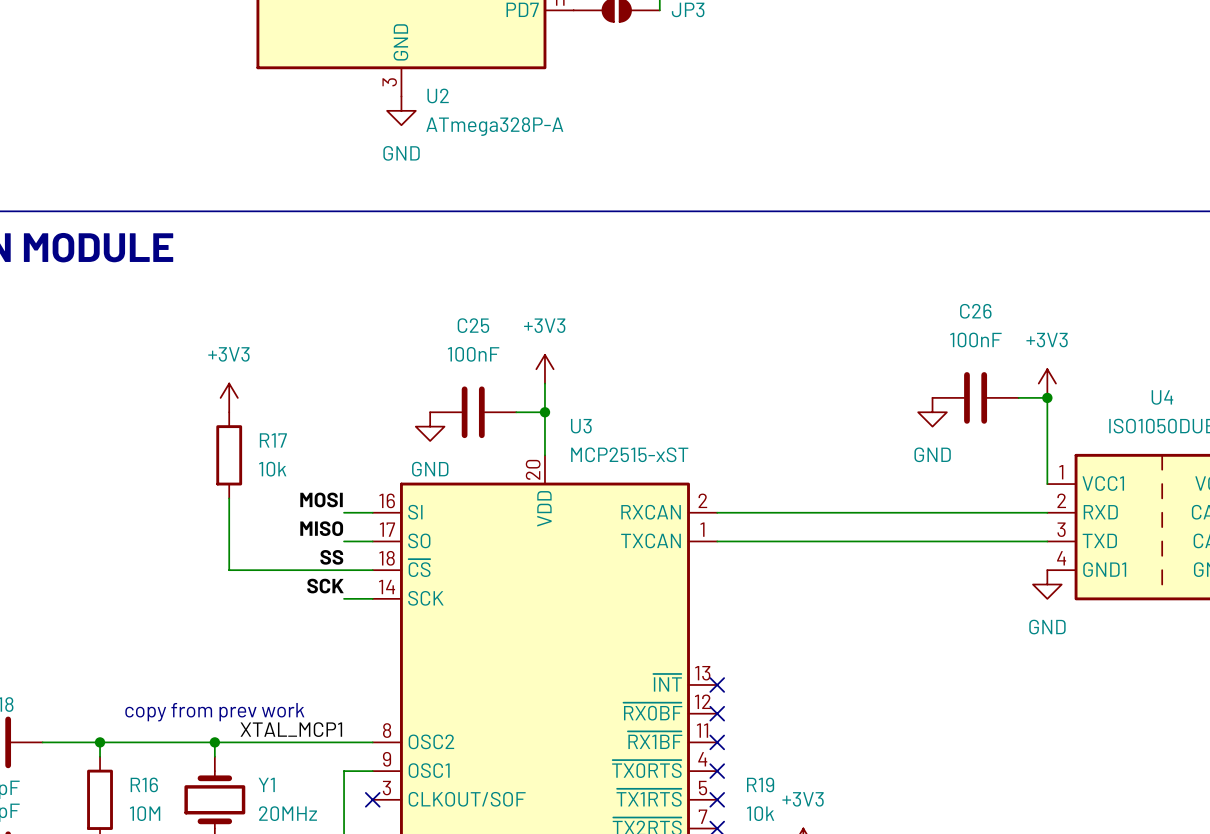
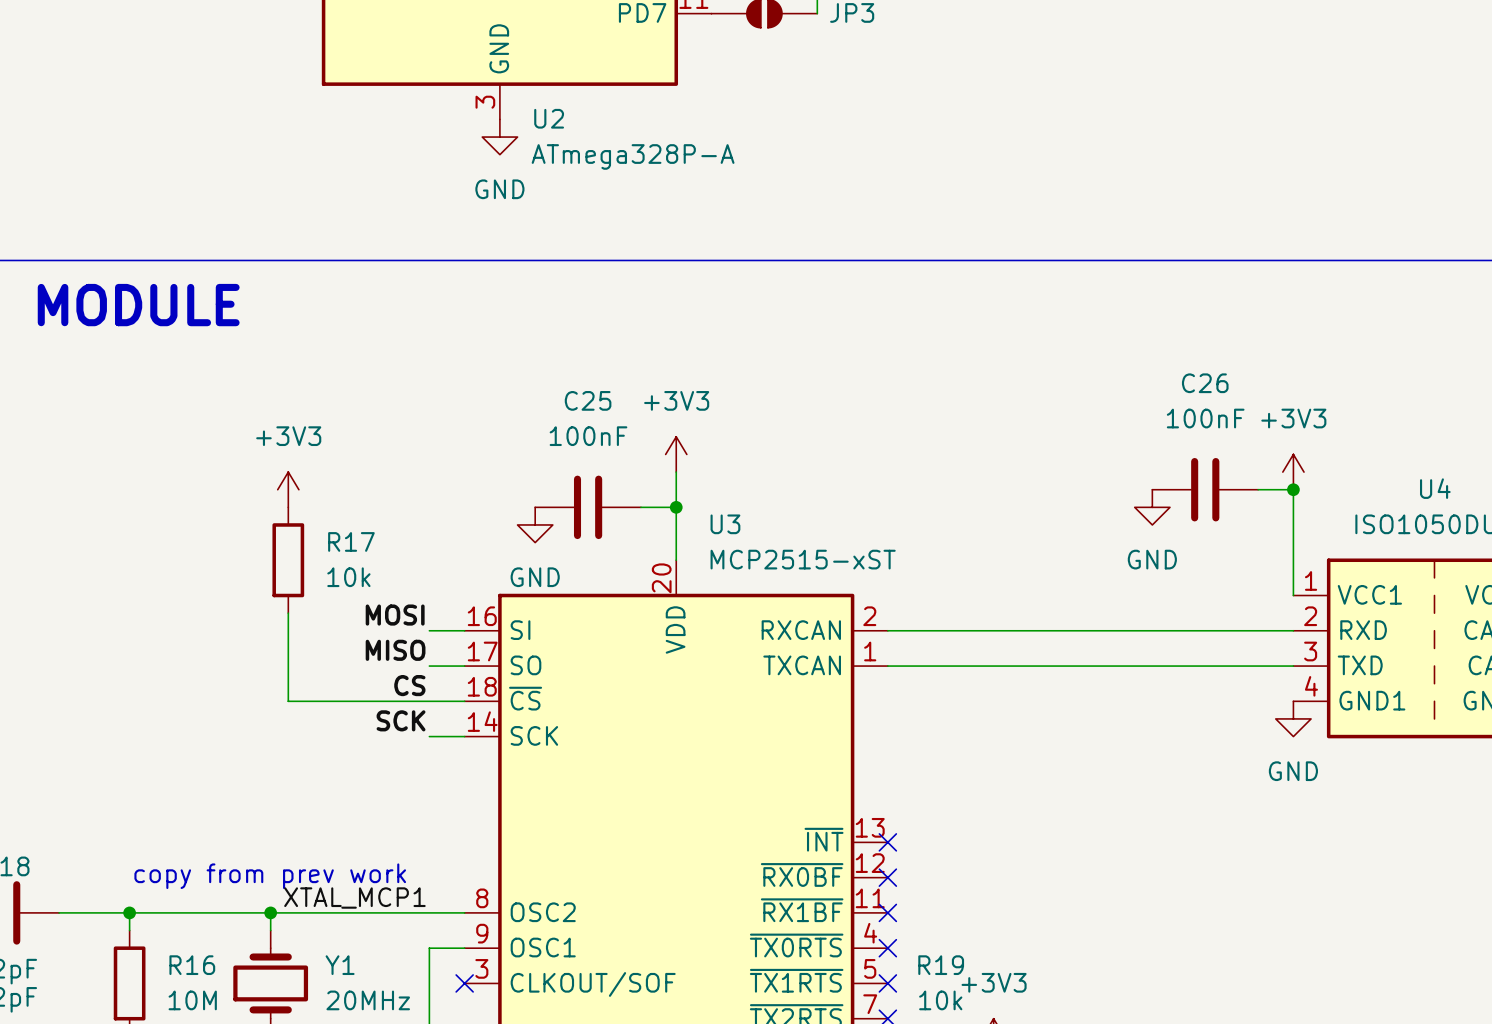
label: SS (331, 557) -> CS (409, 685)

